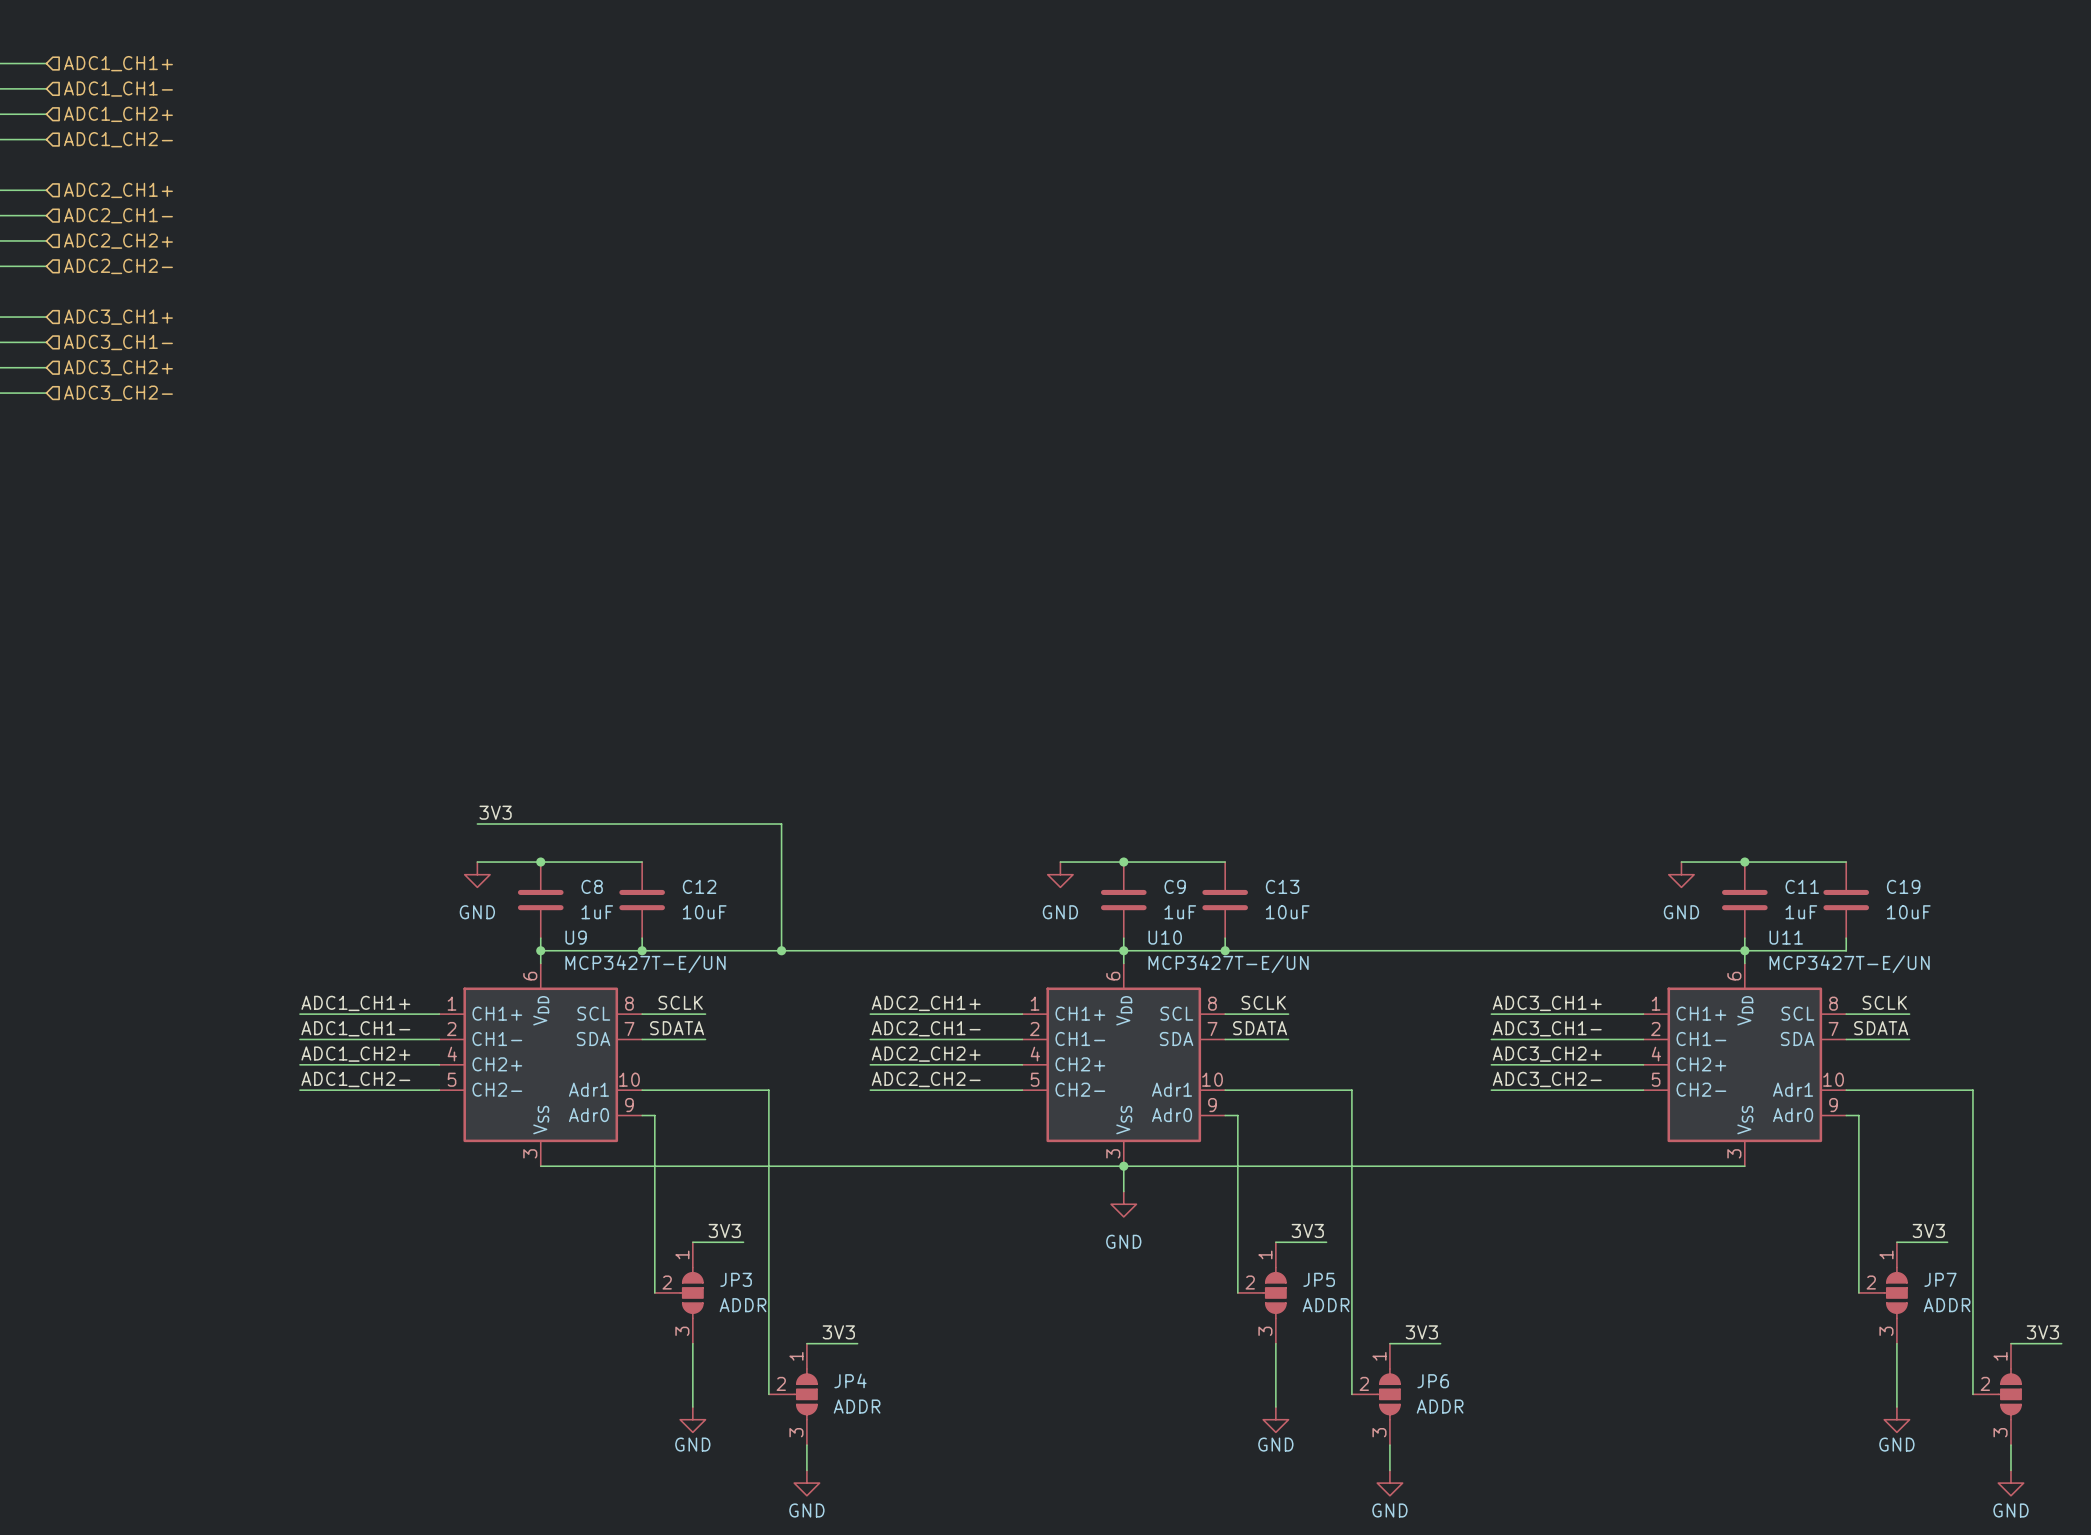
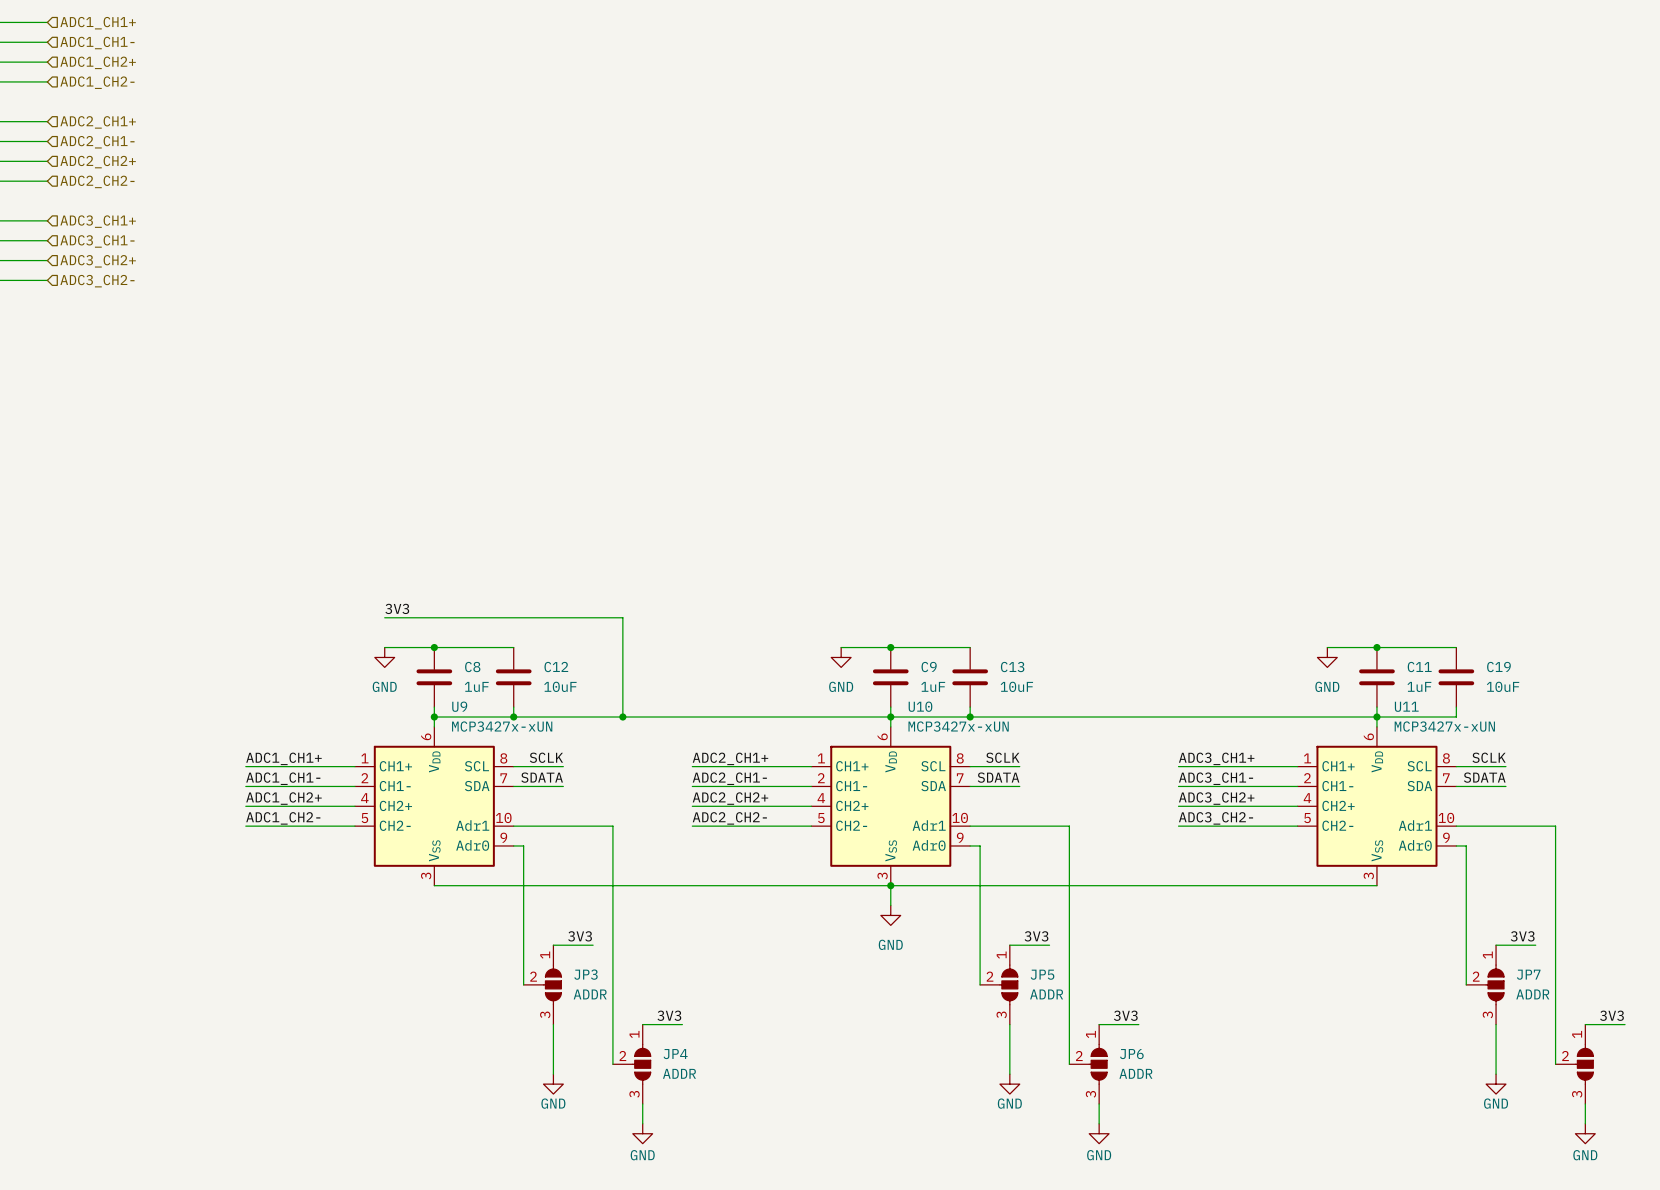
U9 value: MCP3427T-E/UN (645, 964) -> MCP3427x-xUN (502, 726)
U10 value: MCP3427T-E/UN (1228, 964) -> MCP3427x-xUN (958, 726)
U11 value: MCP3427T-E/UN (1849, 964) -> MCP3427x-xUN (1444, 726)

